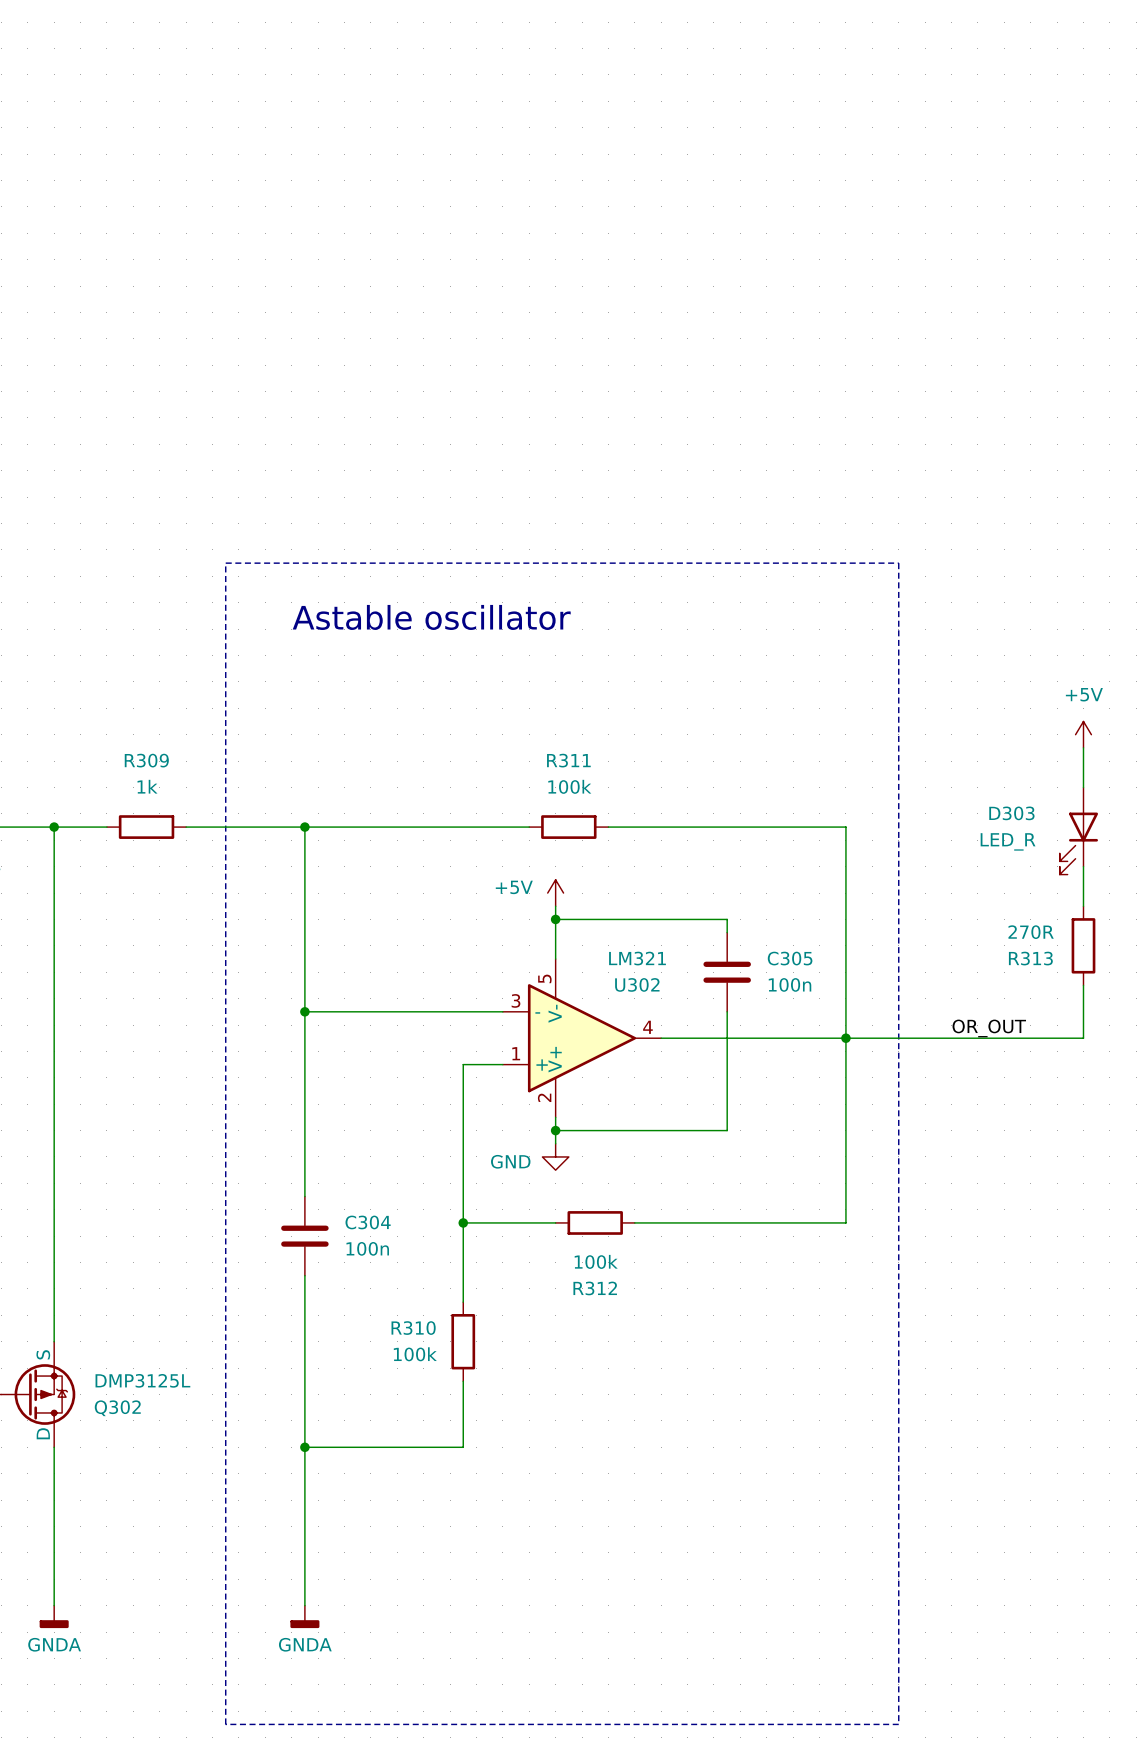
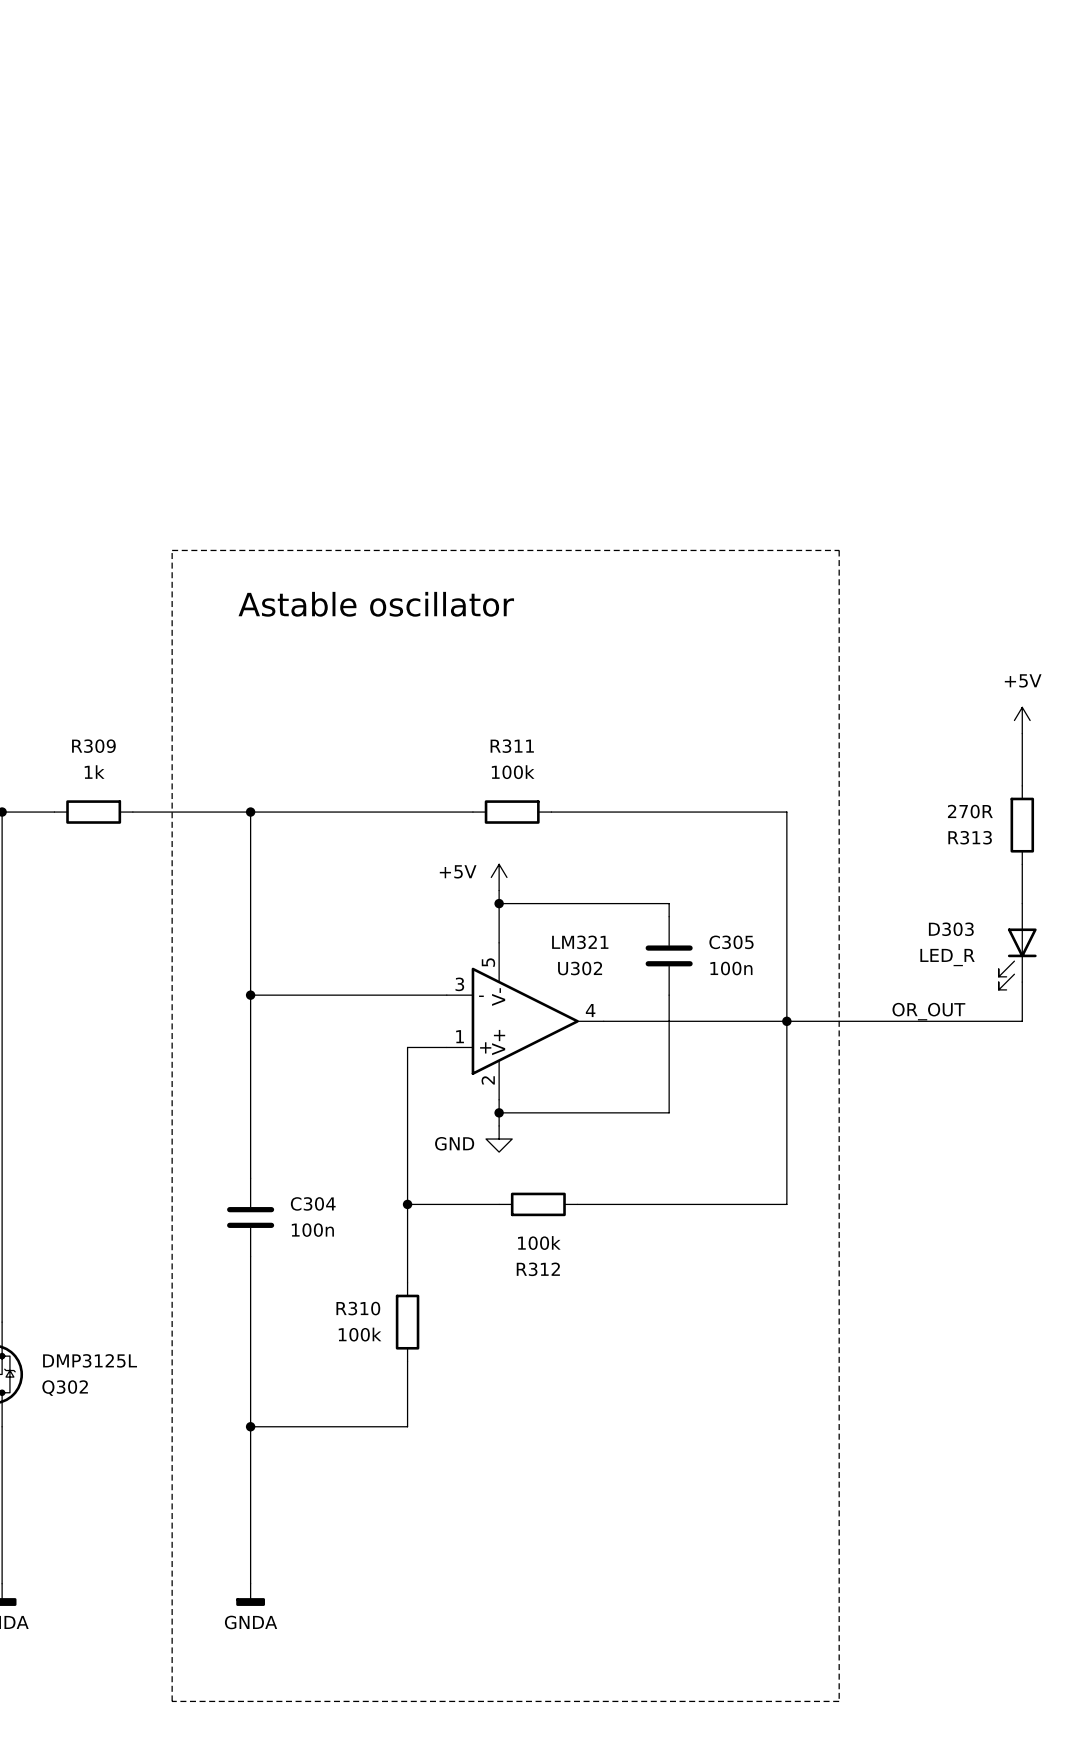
D303 position: (1078, 831) -> (1017, 946)
R313 position: (1083, 945) -> (1022, 825)

